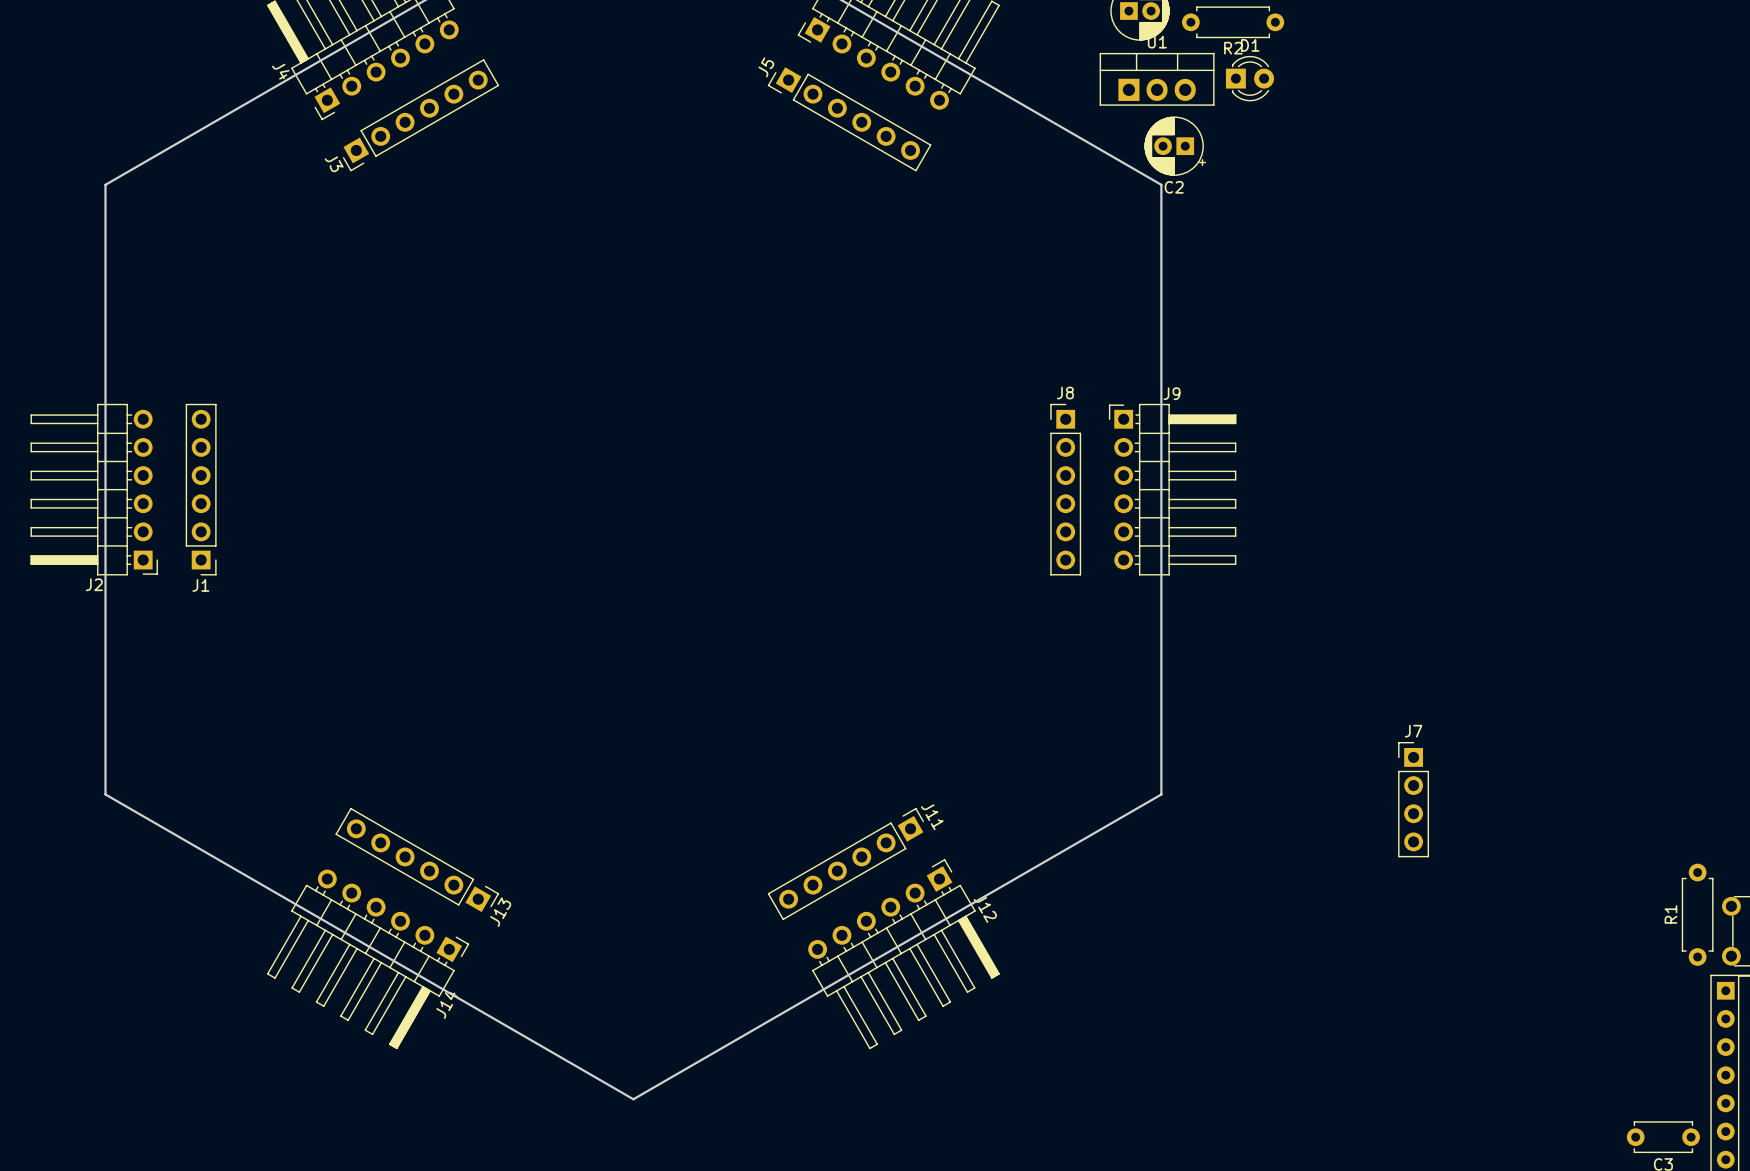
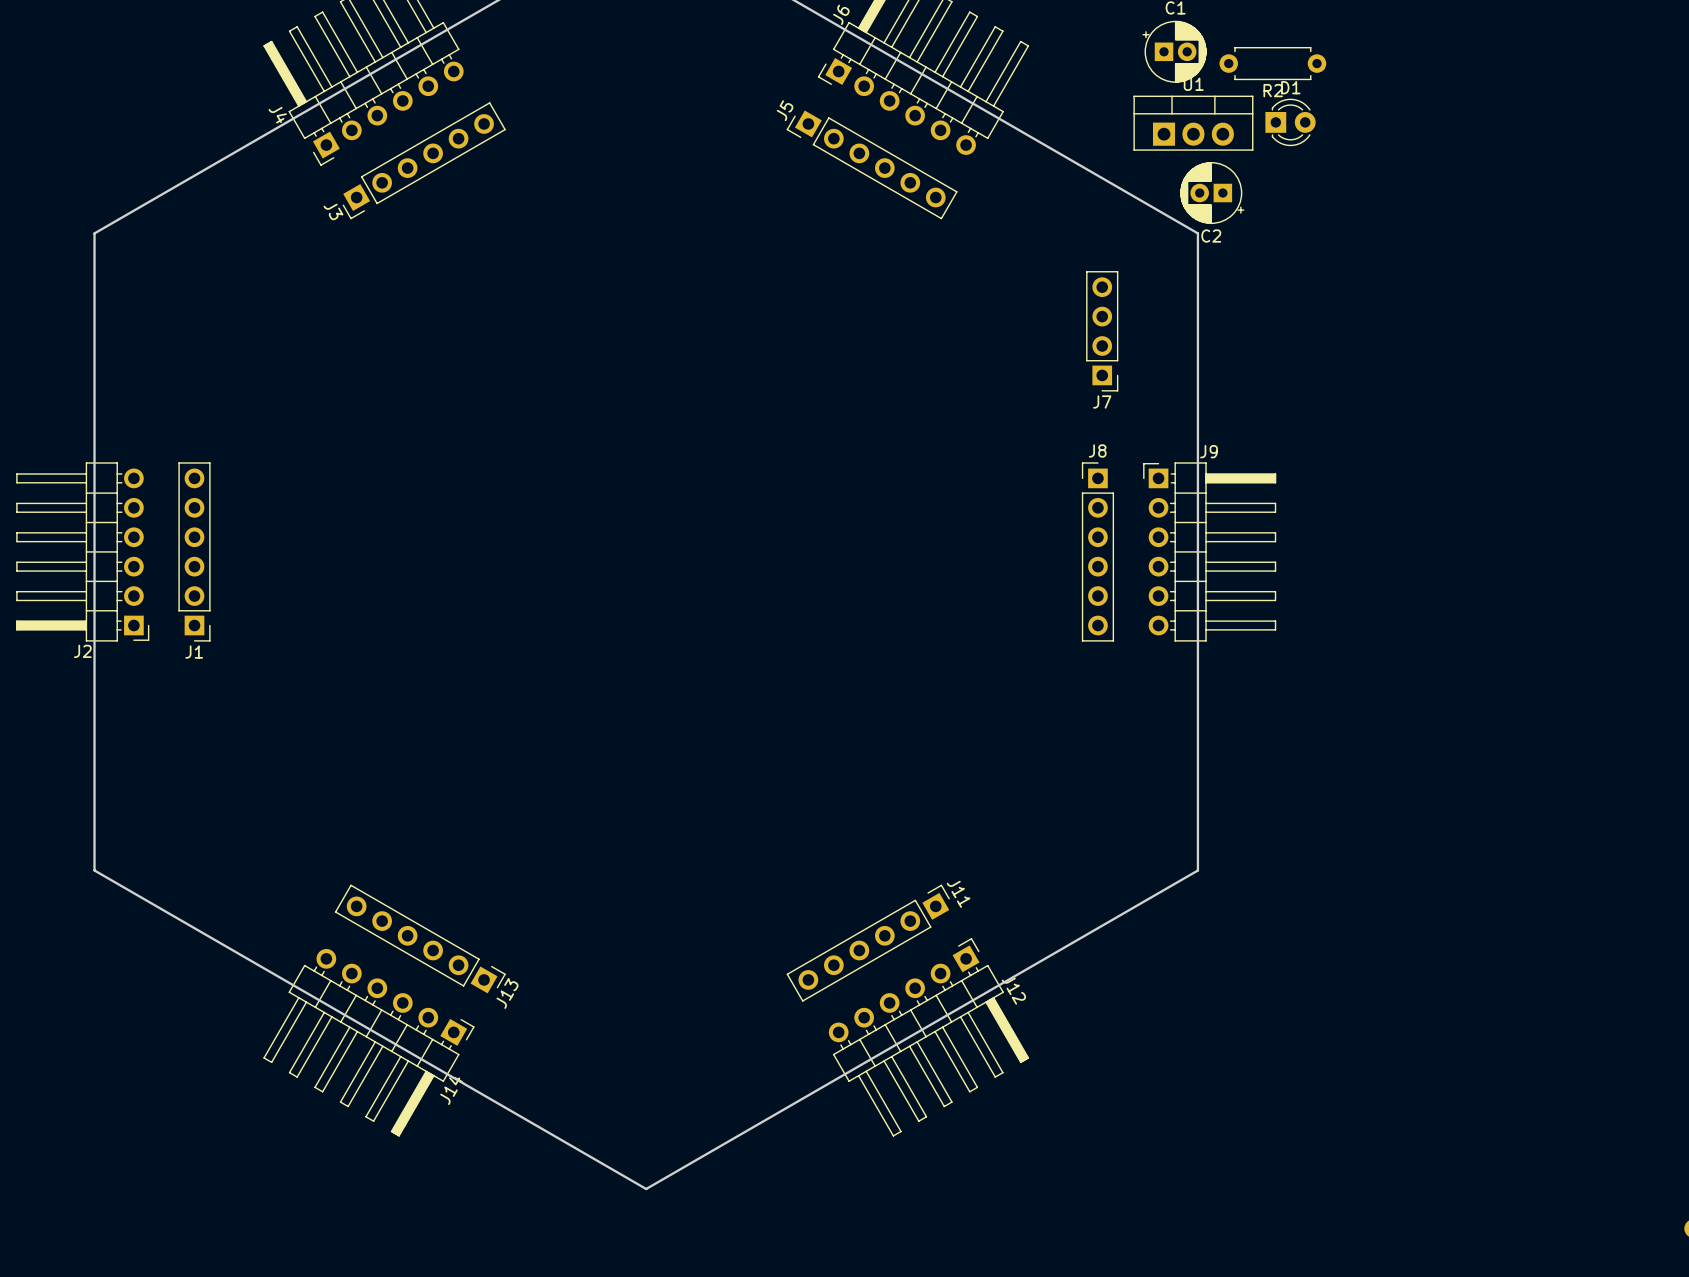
J7 rotation: 0° (1413, 799) -> 180° (1102, 331)
J7 position: (1413, 799) -> (1102, 331)

